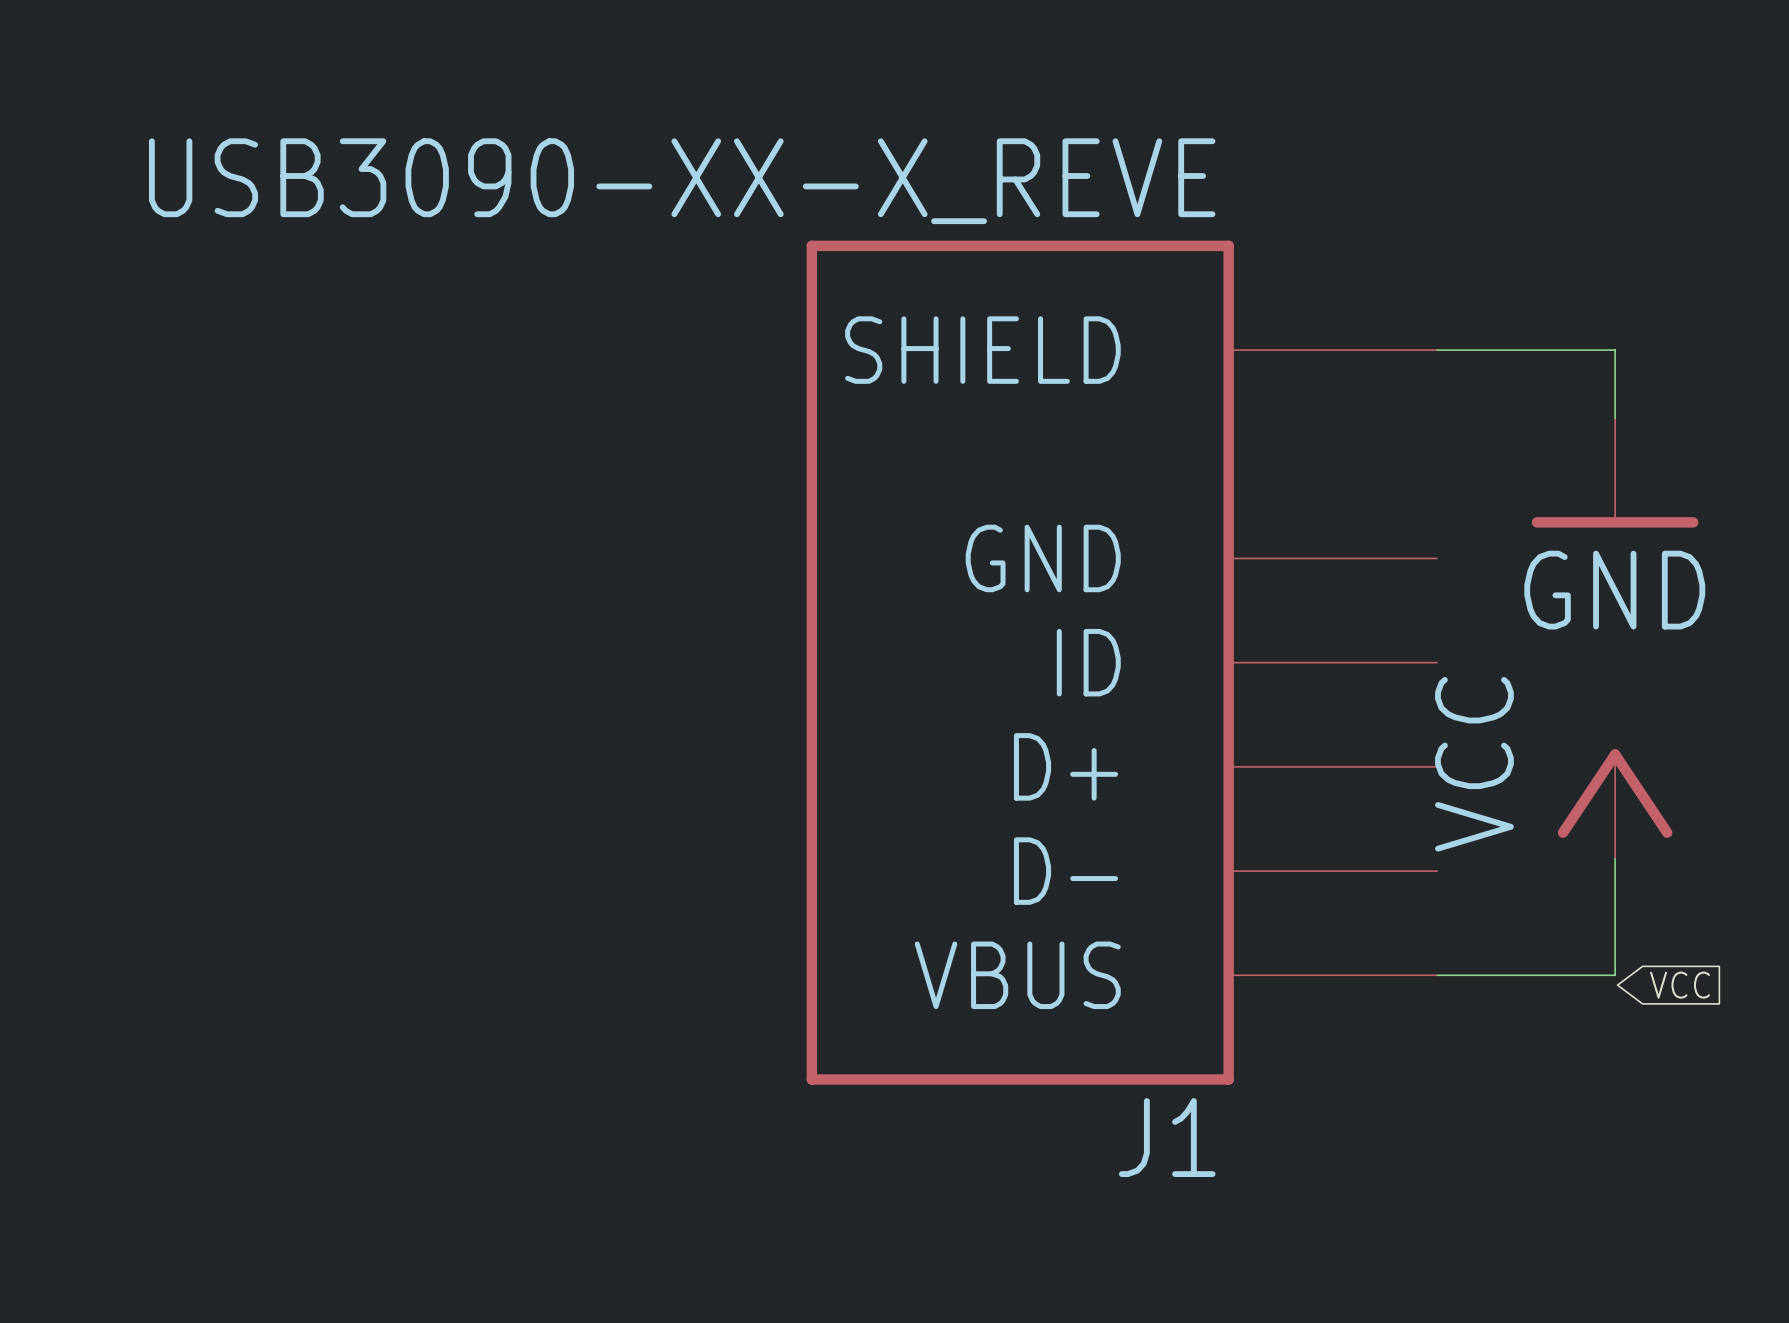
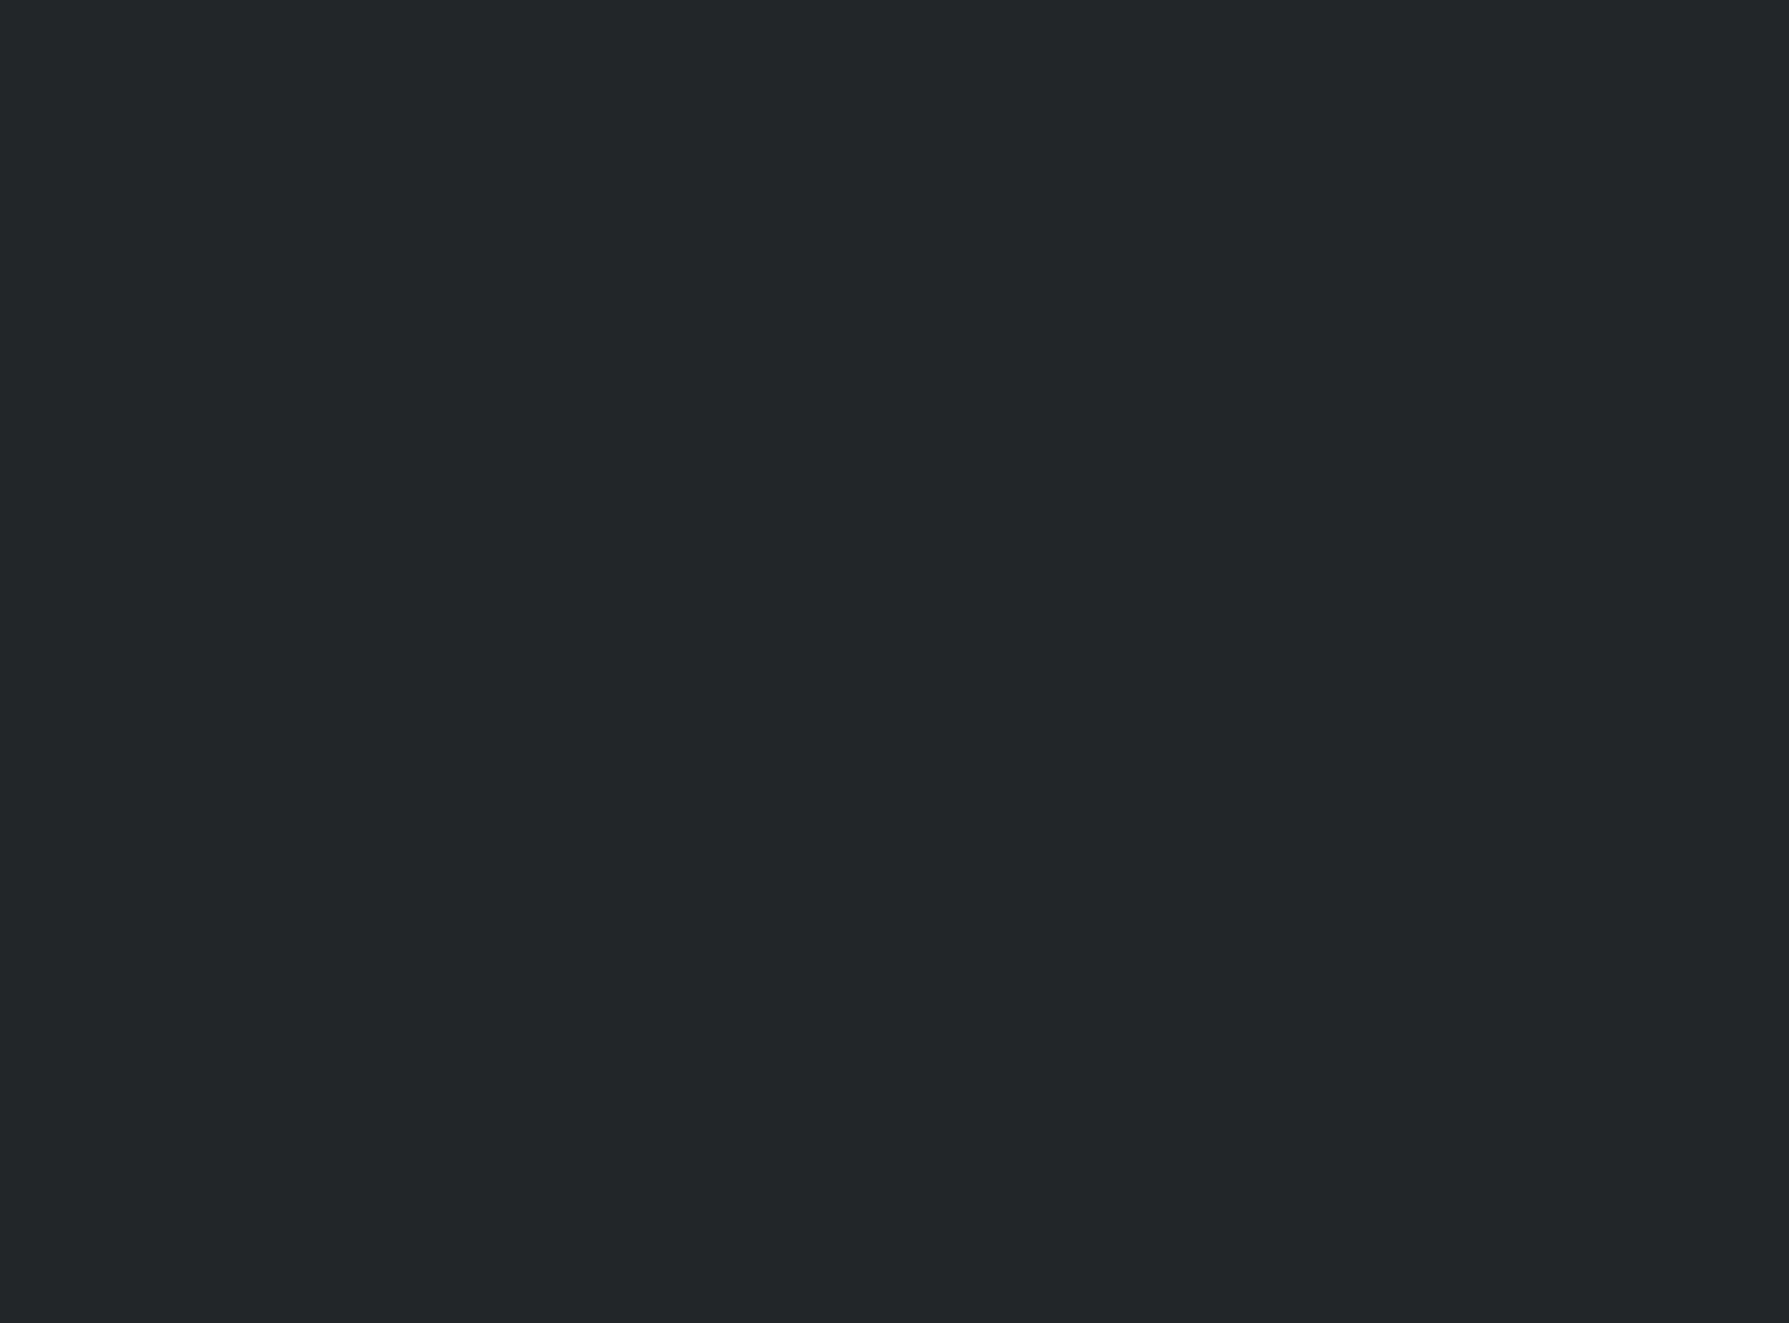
wire: (1437, 350) (1615, 350) (1615, 418) -> none
power symbol: GND (1615, 472) -> none
J1: USB3090-XX-X_REVE (1121, 662) -> none
power symbol: VCC (1615, 804) -> none
wire: (1615, 858) (1615, 975) (1437, 975) -> none
global label: VCC (1679, 985) -> none

